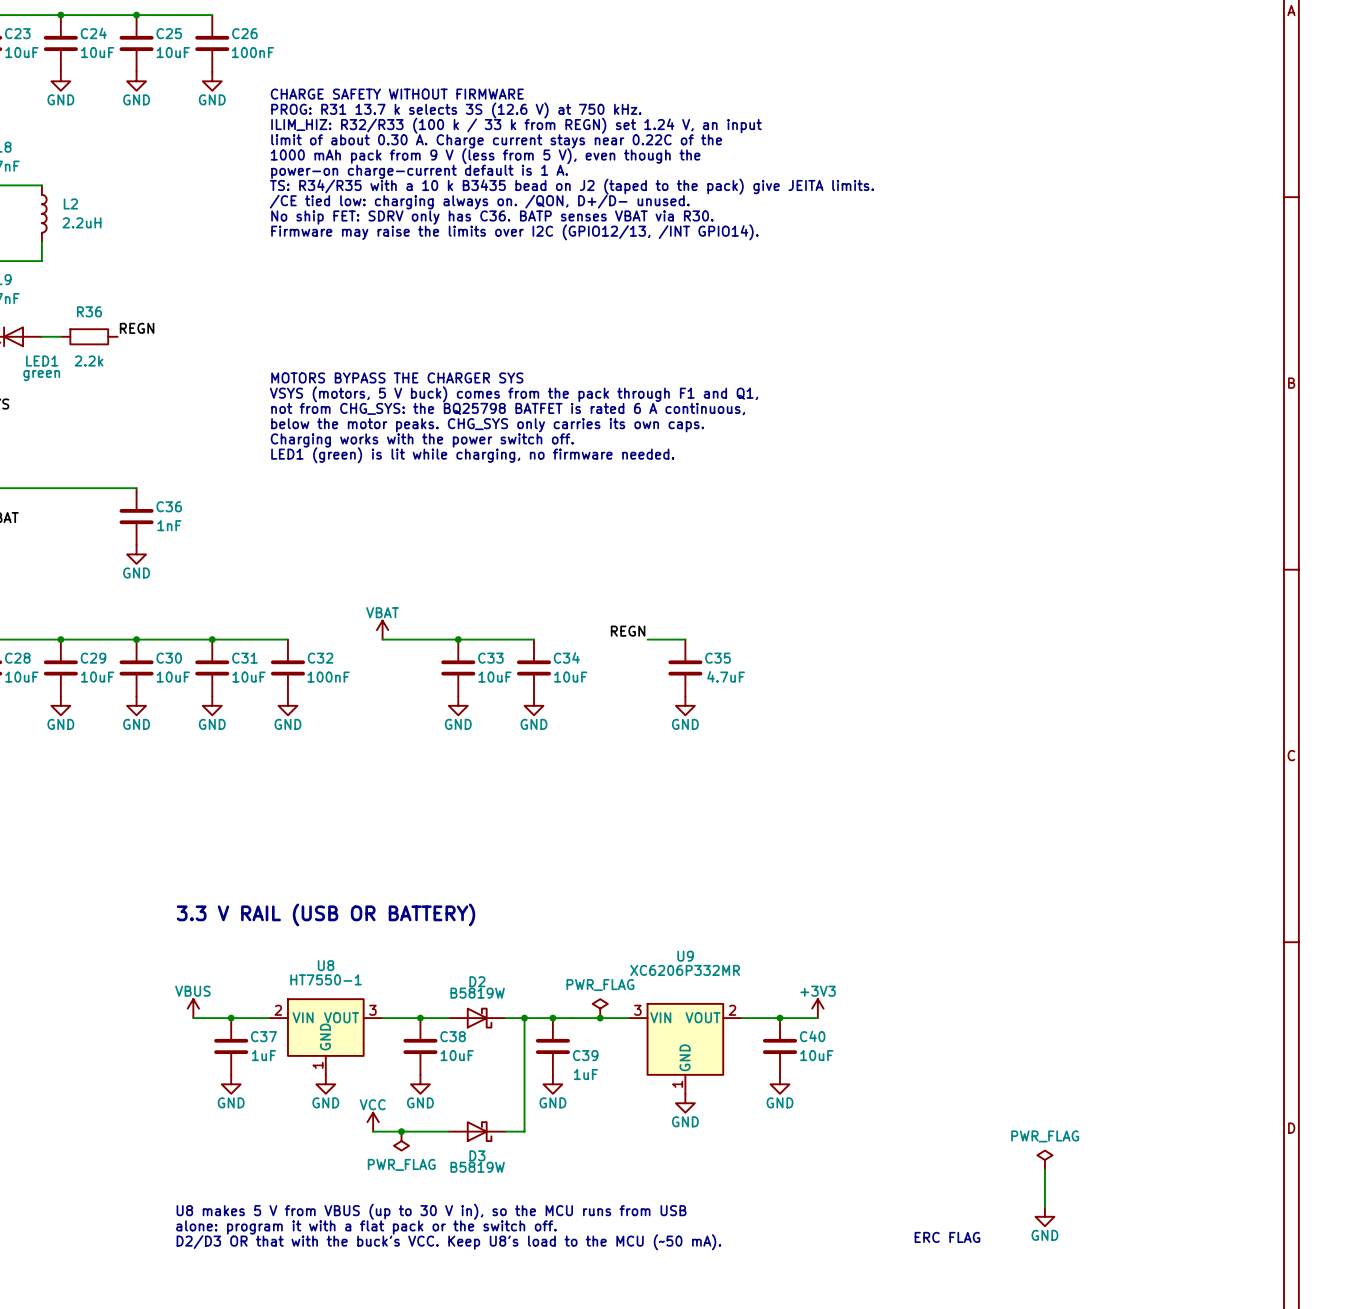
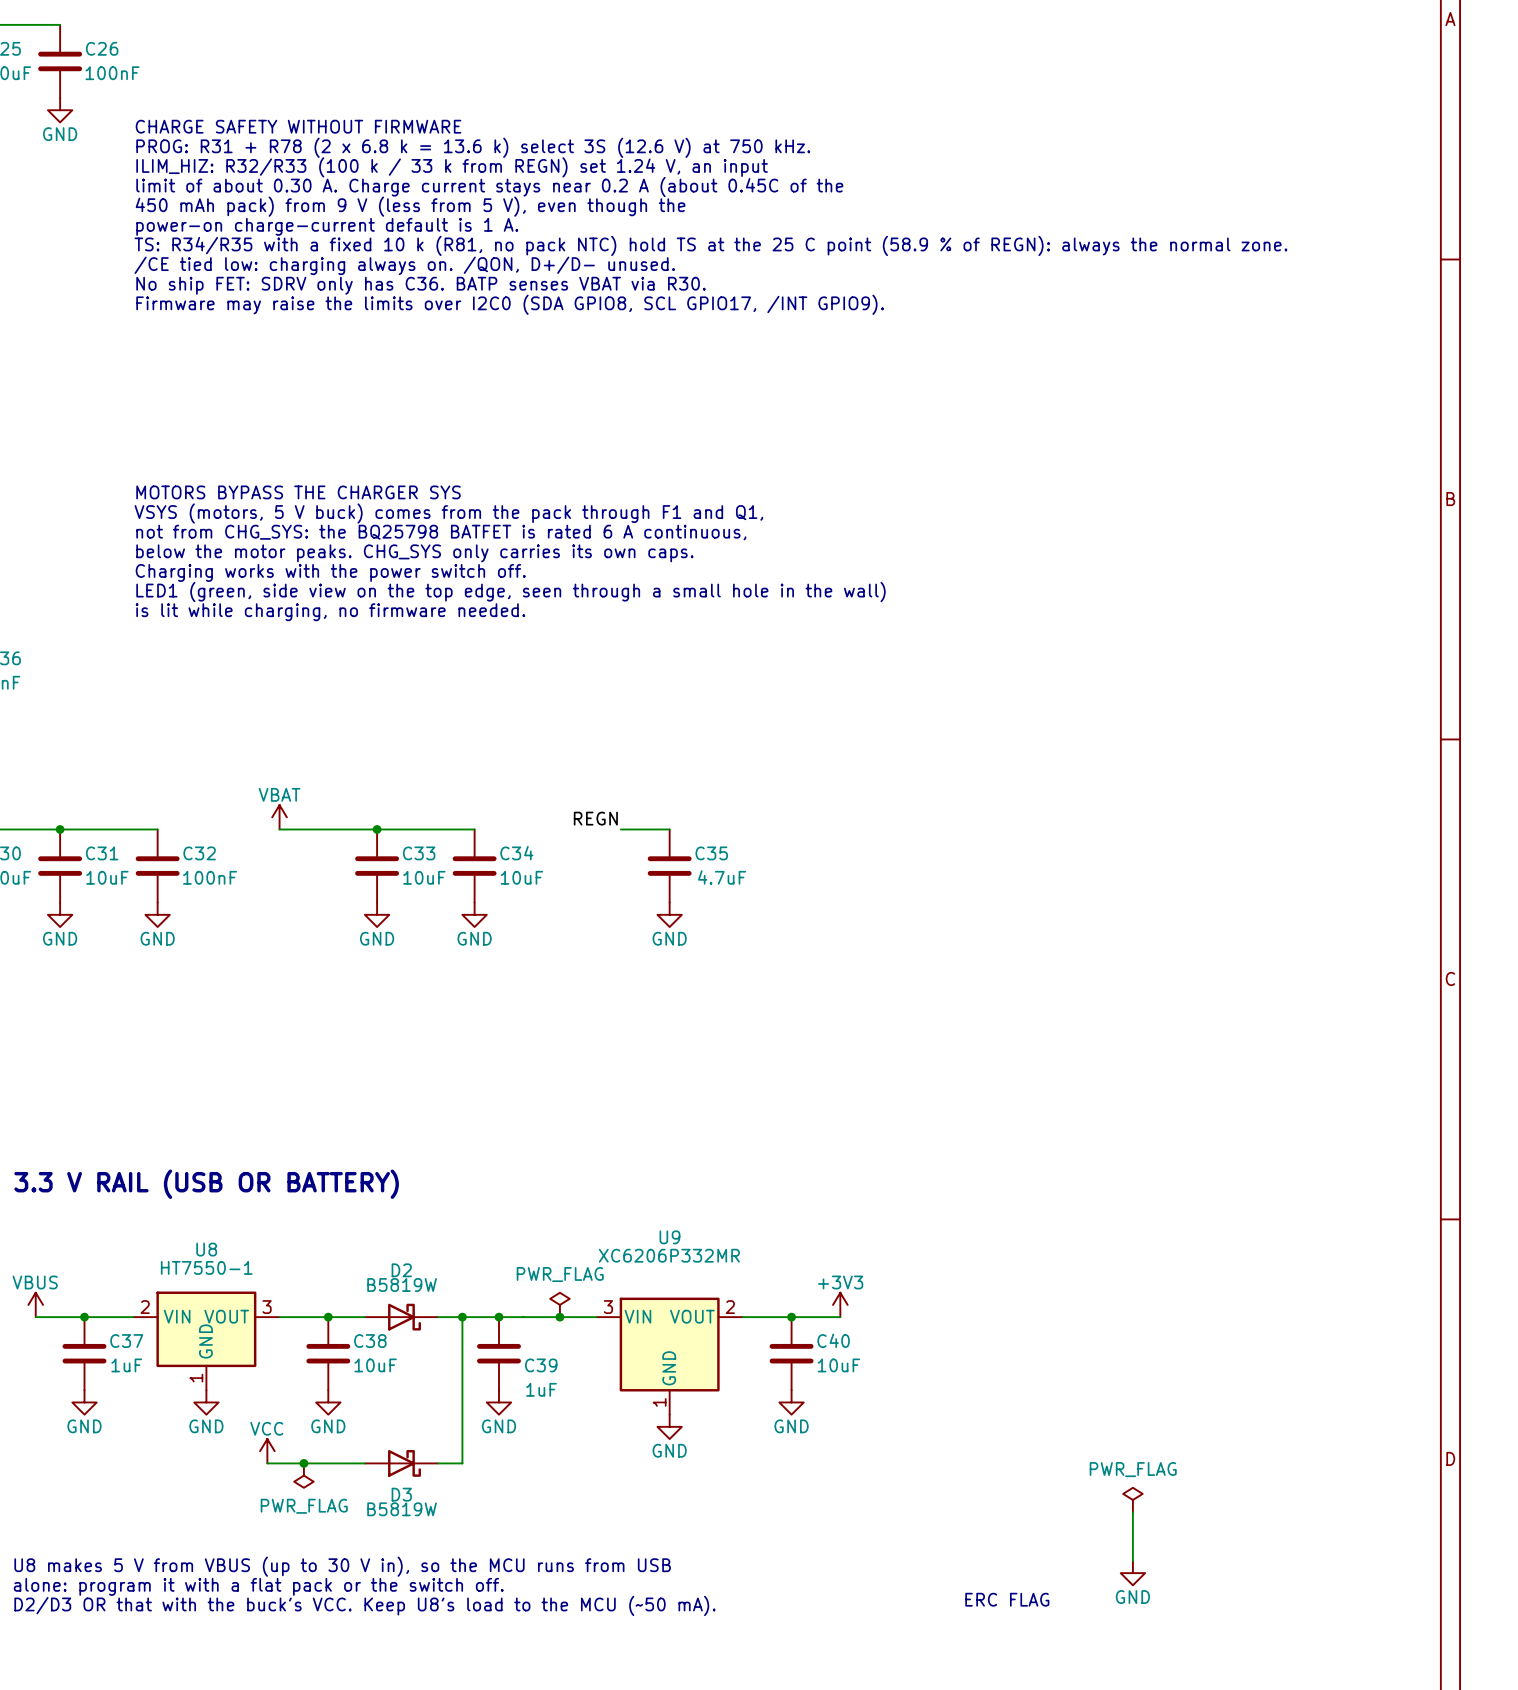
text: PROG: R31 13.7 k selects 3S (12.6 V) at 750 kHz. (456, 110) -> PROG: R31 + R78 (2 x 6.8 k = 13.6 k) select 3S (12.6 V) at 750 kHz. (473, 147)
text: limit of about 0.30 A. Charge current stays near 0.22C of the (496, 141) -> limit of about 0.30 A. Charge current stays near 0.2 A (about 0.45C of the (489, 187)
text: 1000 mAh pack from 9 V (less from 5 V), even though the (485, 156) -> 450 mAh pack) from 9 V (less from 5 V), even though the (410, 206)
text: TS: R34/R35 with a 10 k B3435 bead on J2 (taped to the pack) give JEITA limits. (571, 186) -> TS: R34/R35 with a fixed 10 k (R81, no pack NTC) hold TS at the 25 C point (58.9 % of REGN): always the normal zone. (710, 245)
text: Firmware may raise the limits over I2C (GPIO12/13, /INT GPIO14). (514, 232) -> Firmware may raise the limits over I2C0 (SDA GPIO8, SCL GPIO17, /INT GPIO9). (510, 304)
text: LED1 (green) is lit while charging, no firmware needed. (472, 455) -> LED1 (green, side view on the top edge, seen through a small hole in the wall) (510, 592)
text: none -> is lit while charging, no firmware needed. (330, 612)

